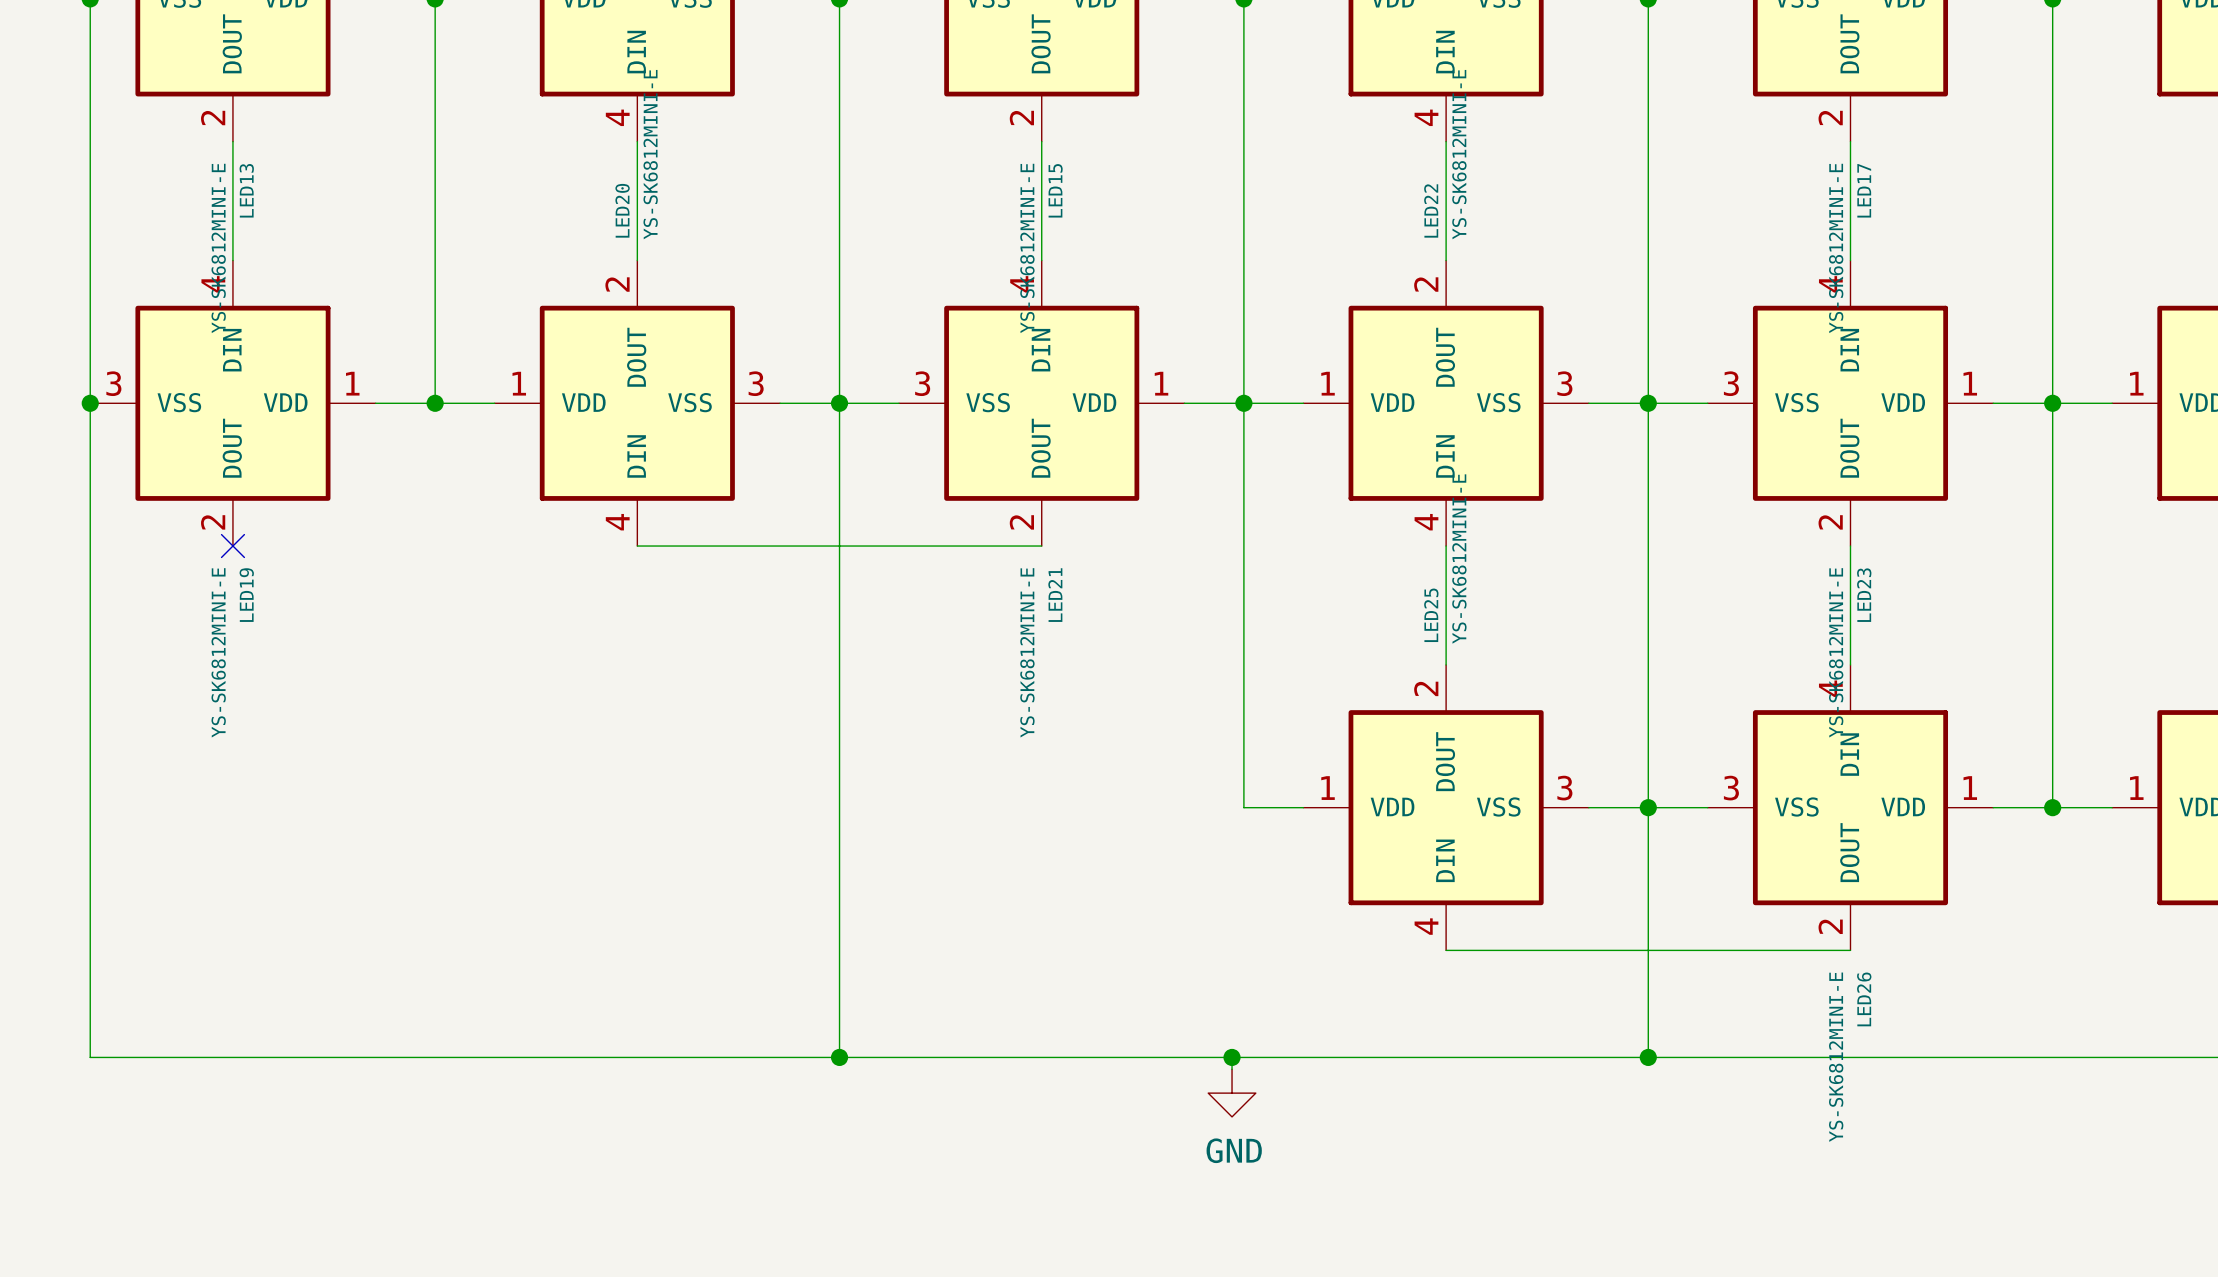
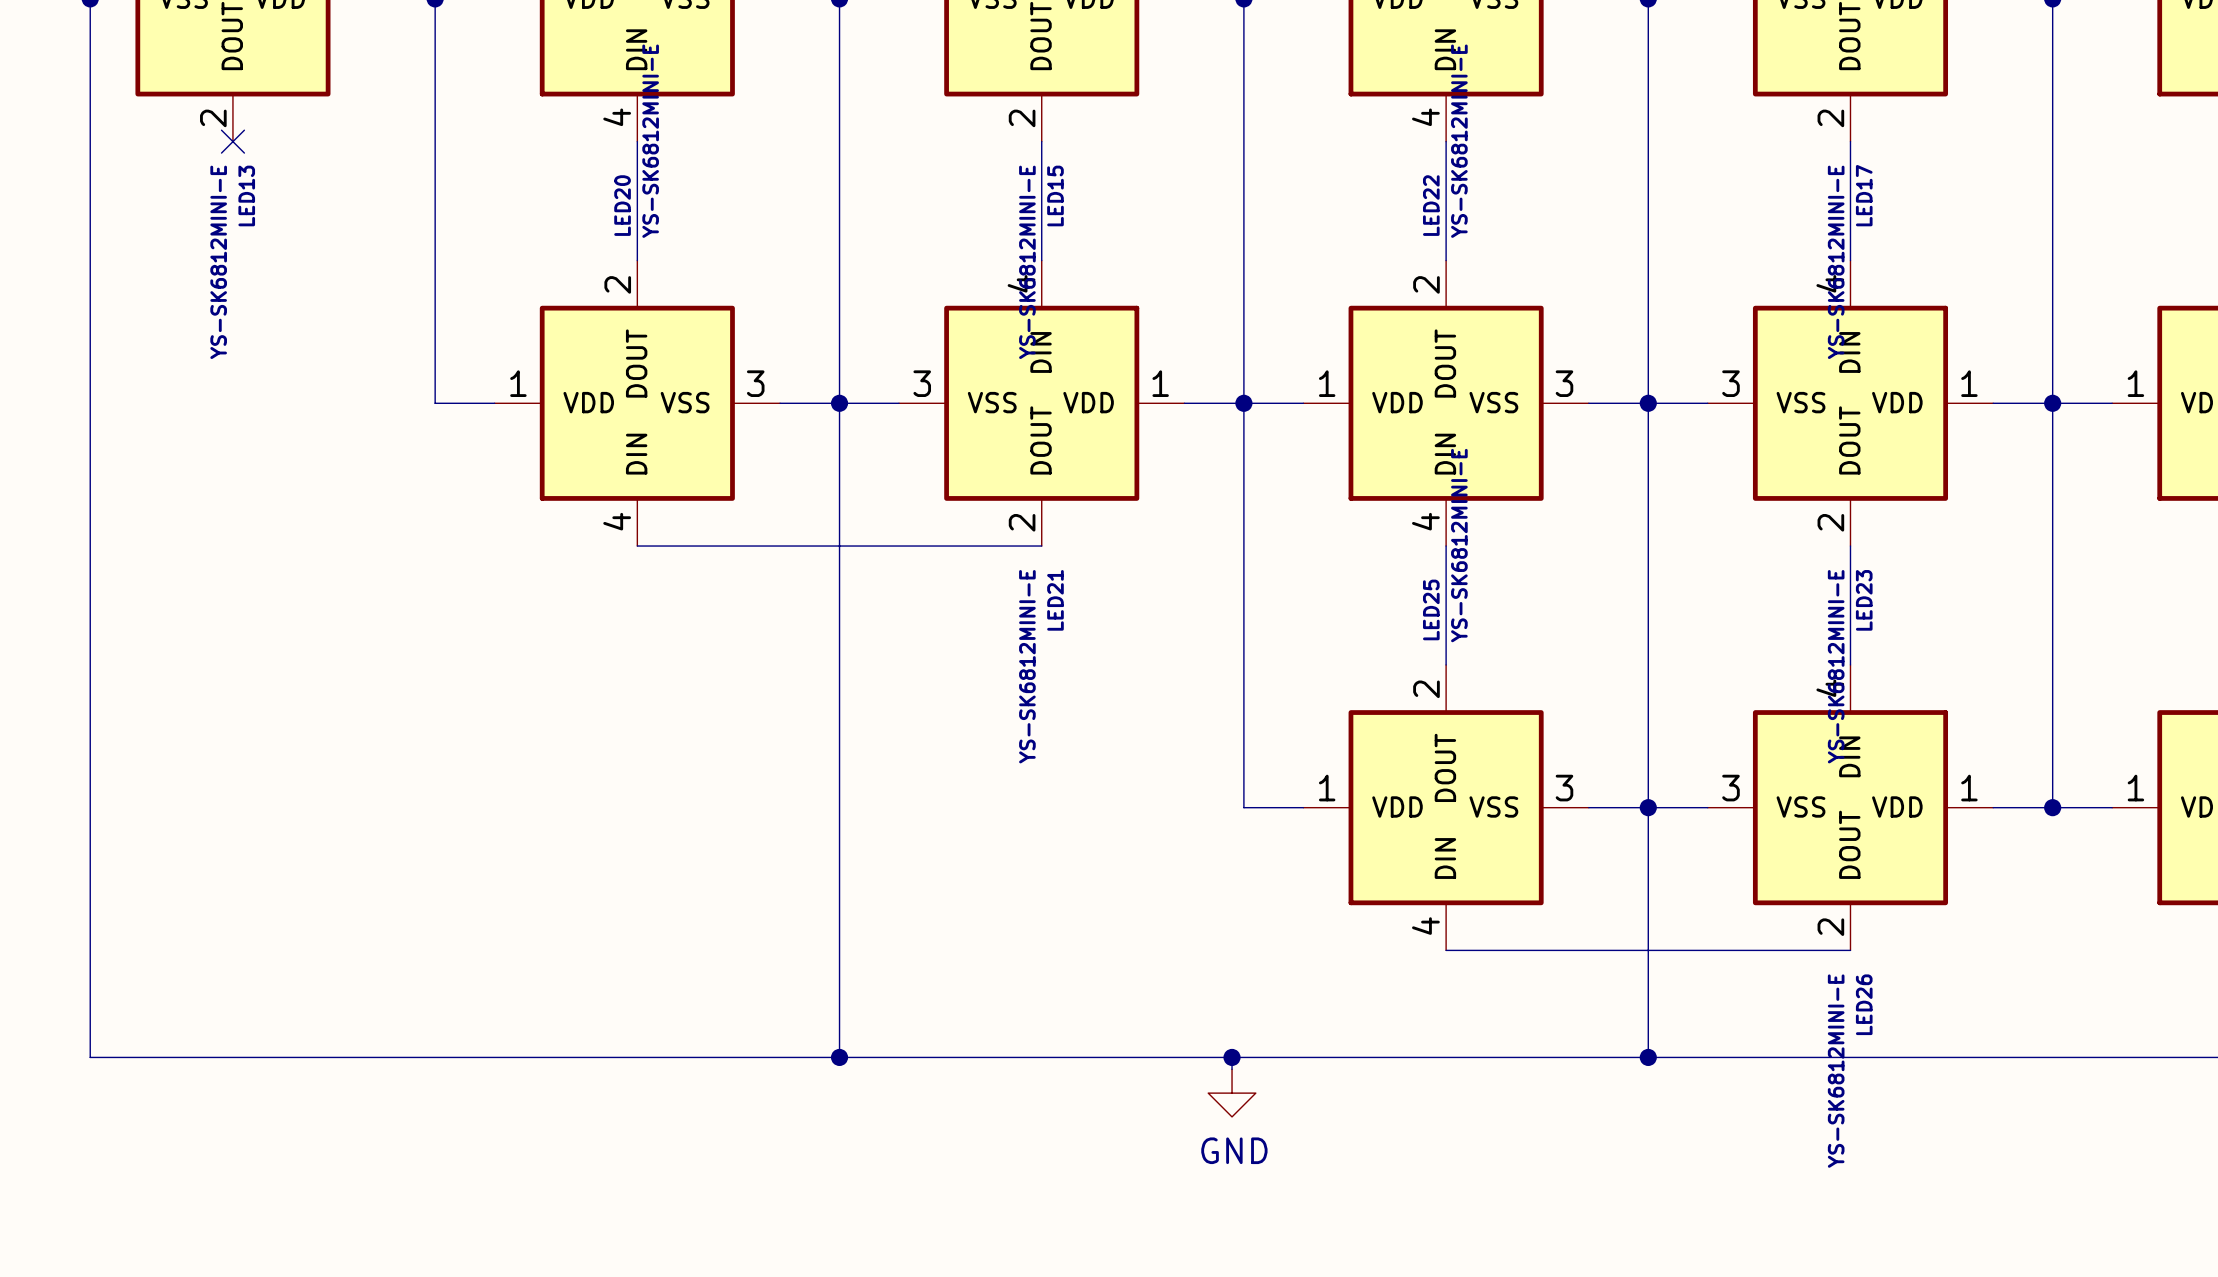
wire: (232, 141) (232, 260) -> none
no-connect mark: none -> (232, 141)
junction: (90, 403) -> none
LED19: YS-SK6812MINI-E (232, 403) -> none
wire: (375, 403) (435, 403) -> none
junction: (435, 403) -> none
no-connect mark: (232, 546) -> none

